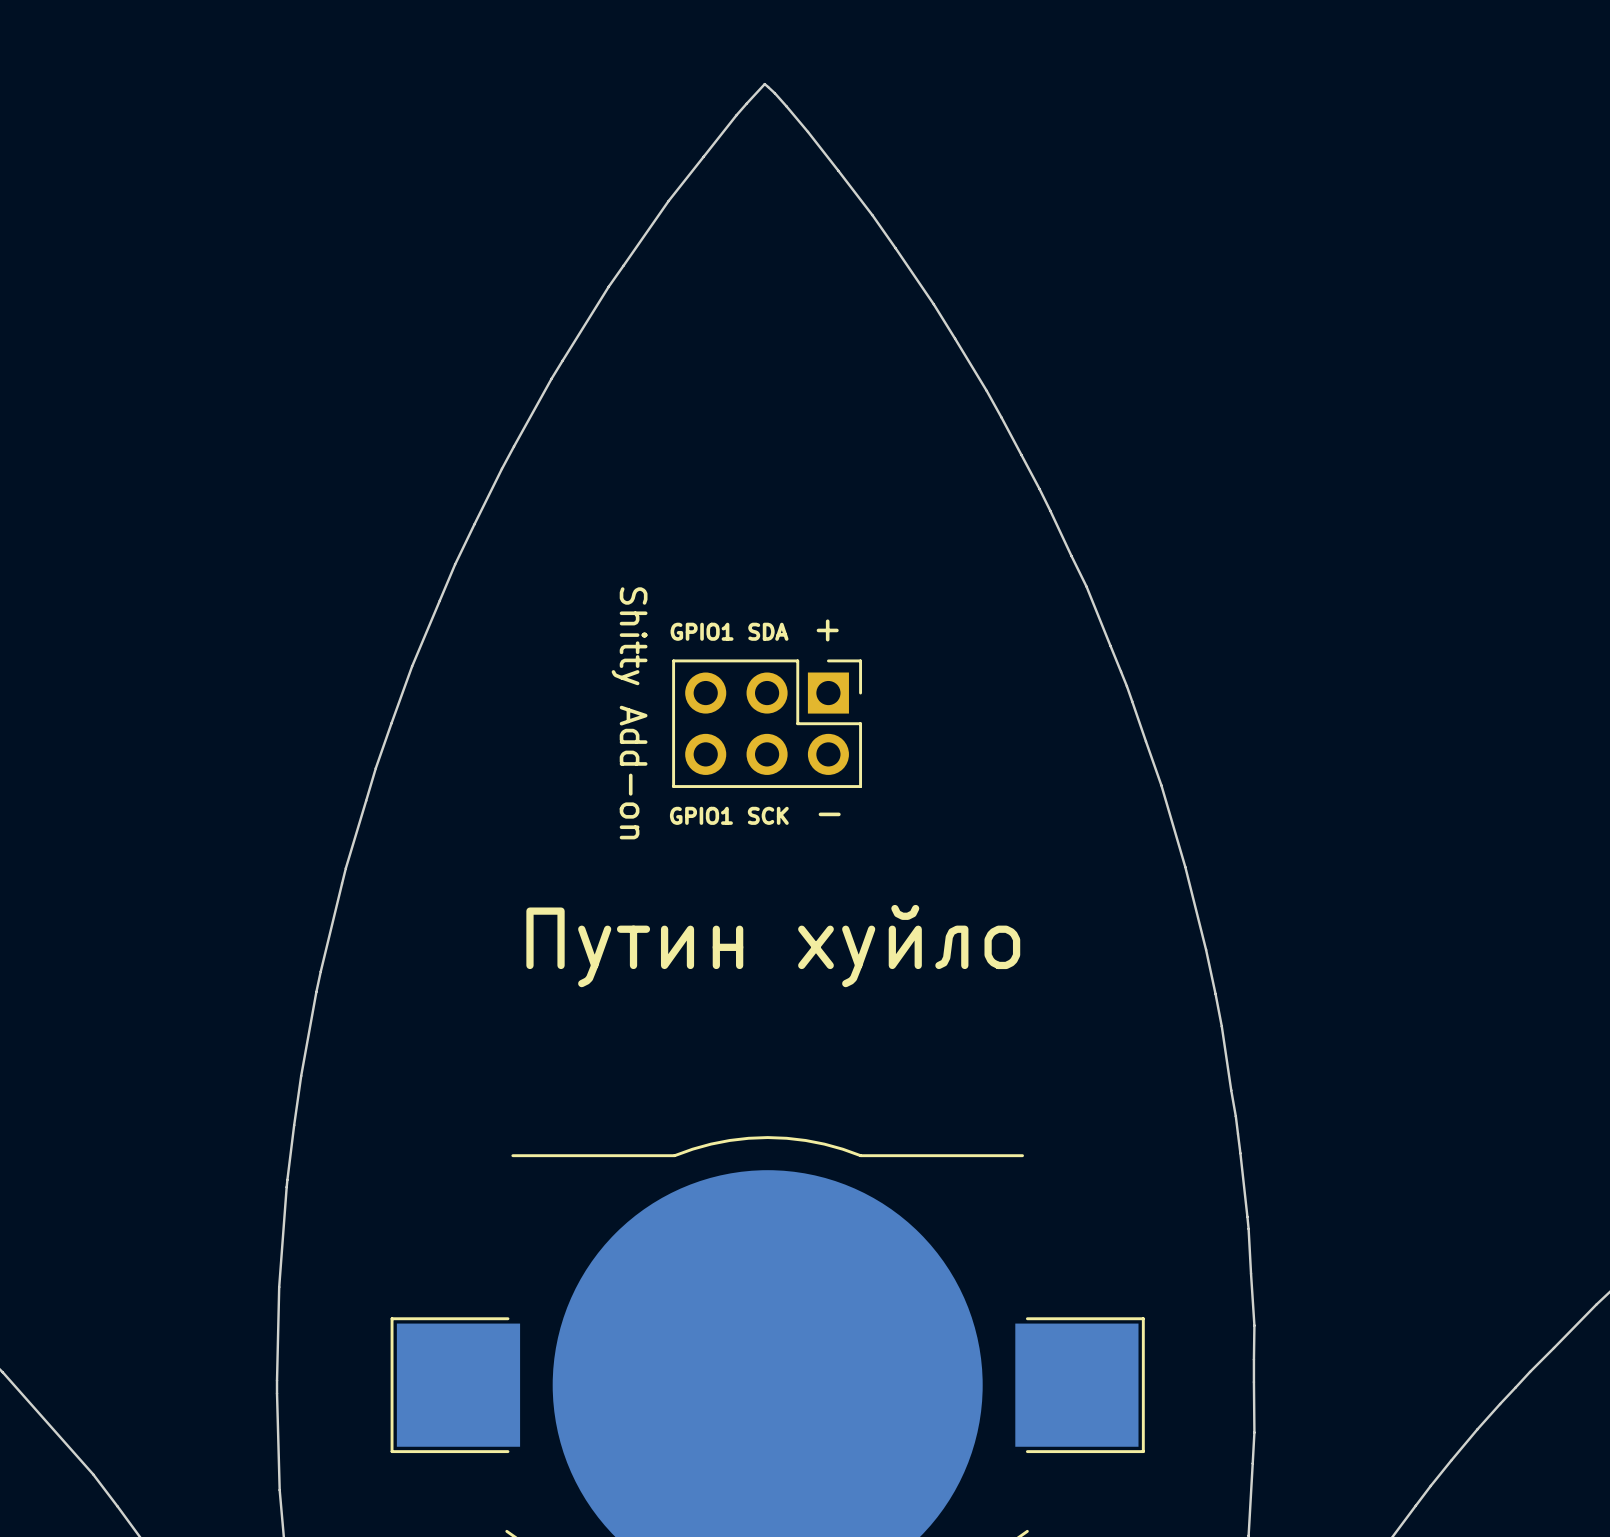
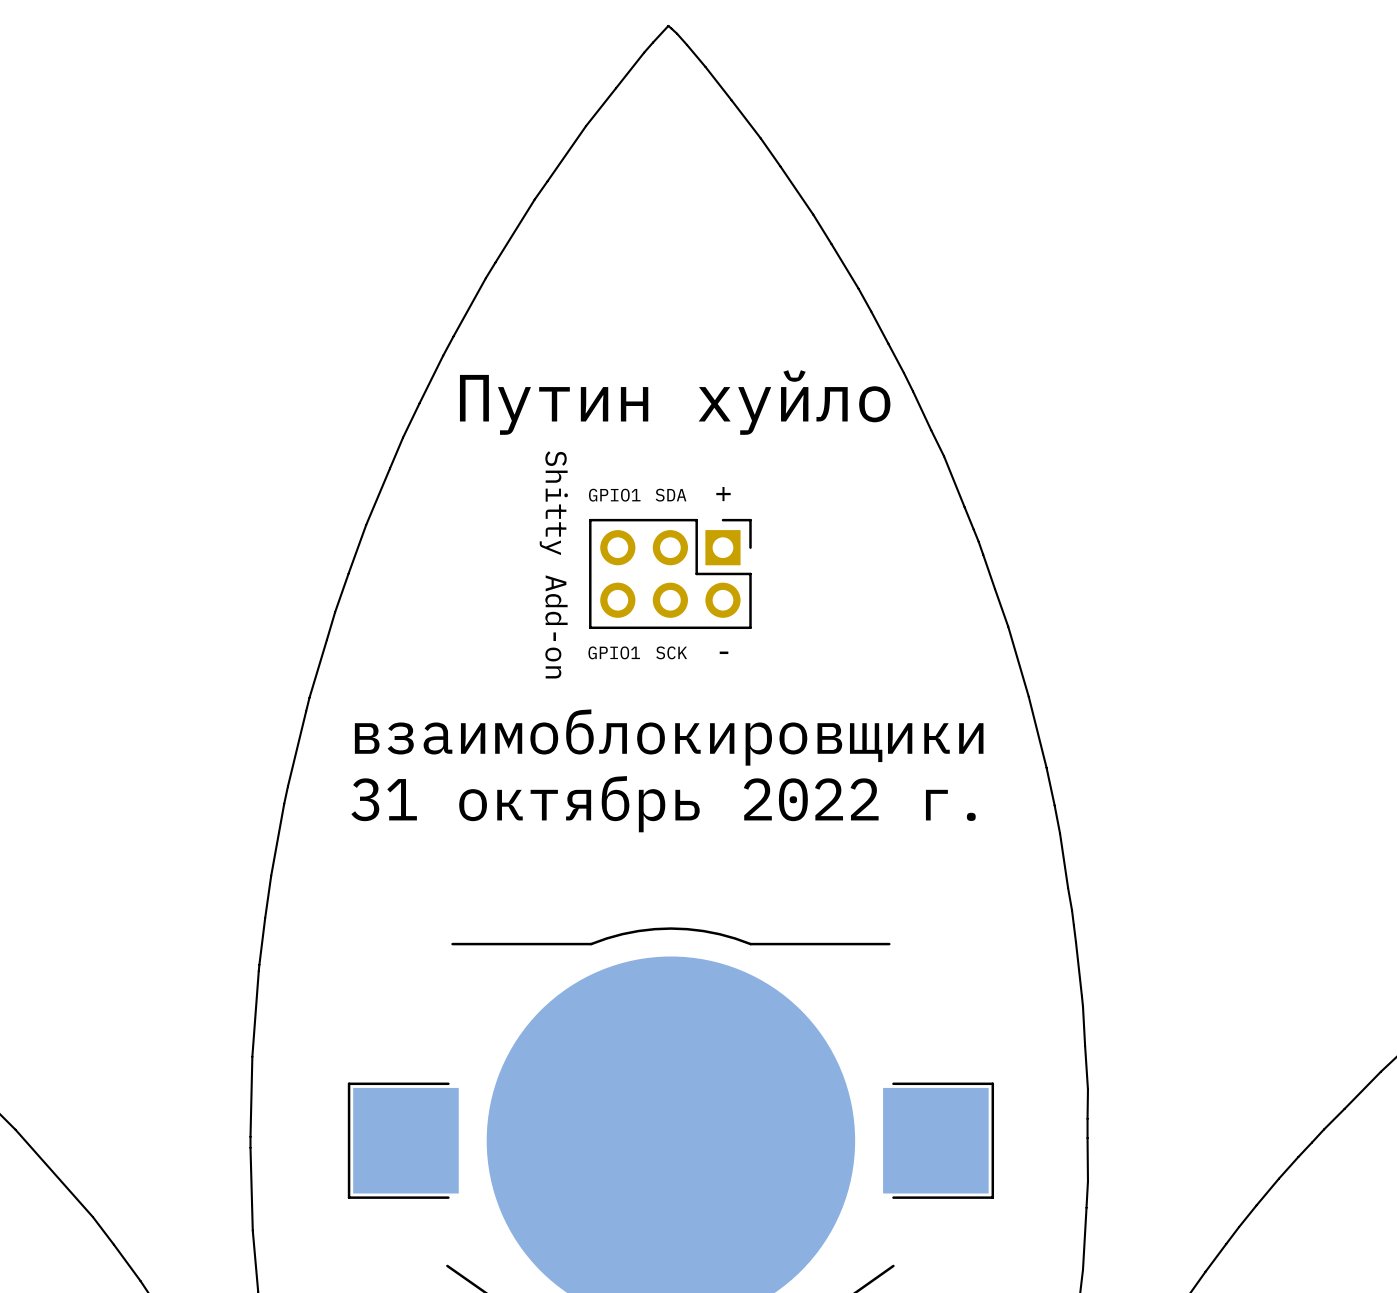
text: none -> взаимоблокировщики (669, 737)
text position: Путин хуйло (773, 946) -> Путин хуйло (675, 402)
text: none -> 31 октябрь 2022 г. (663, 804)

